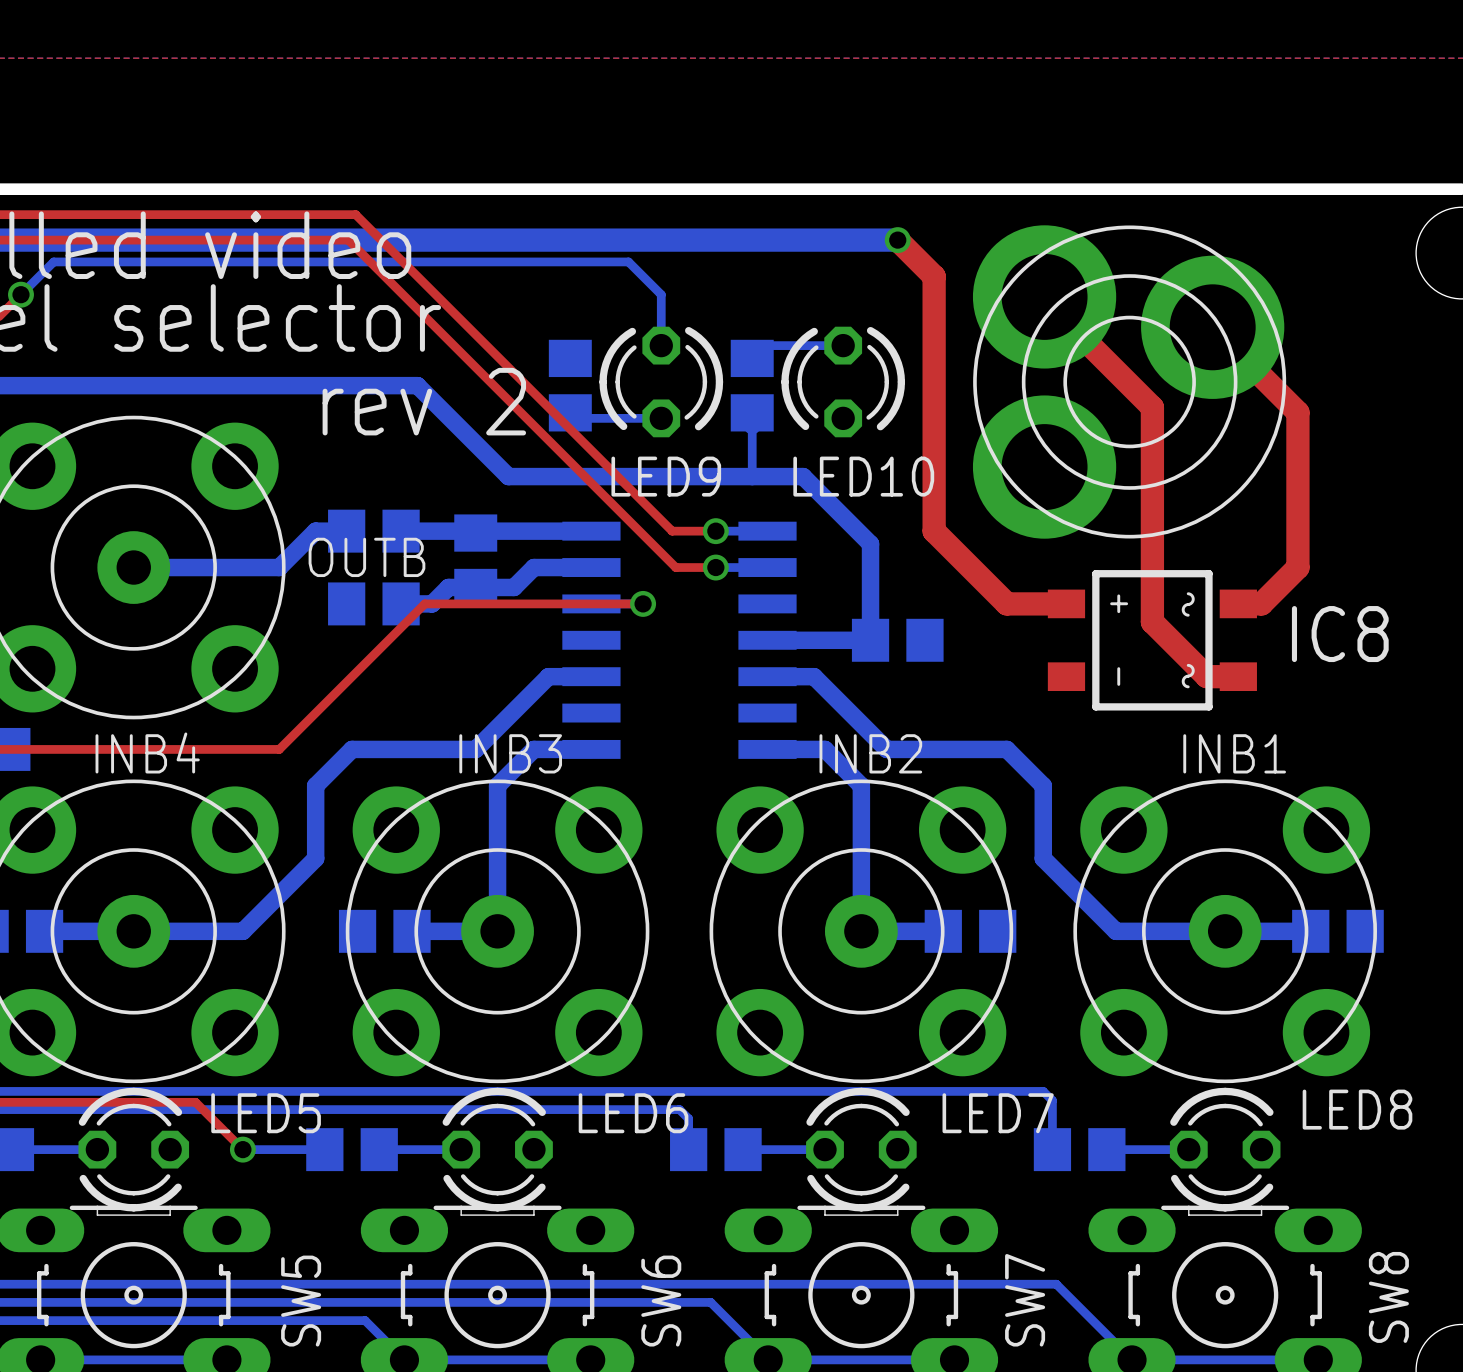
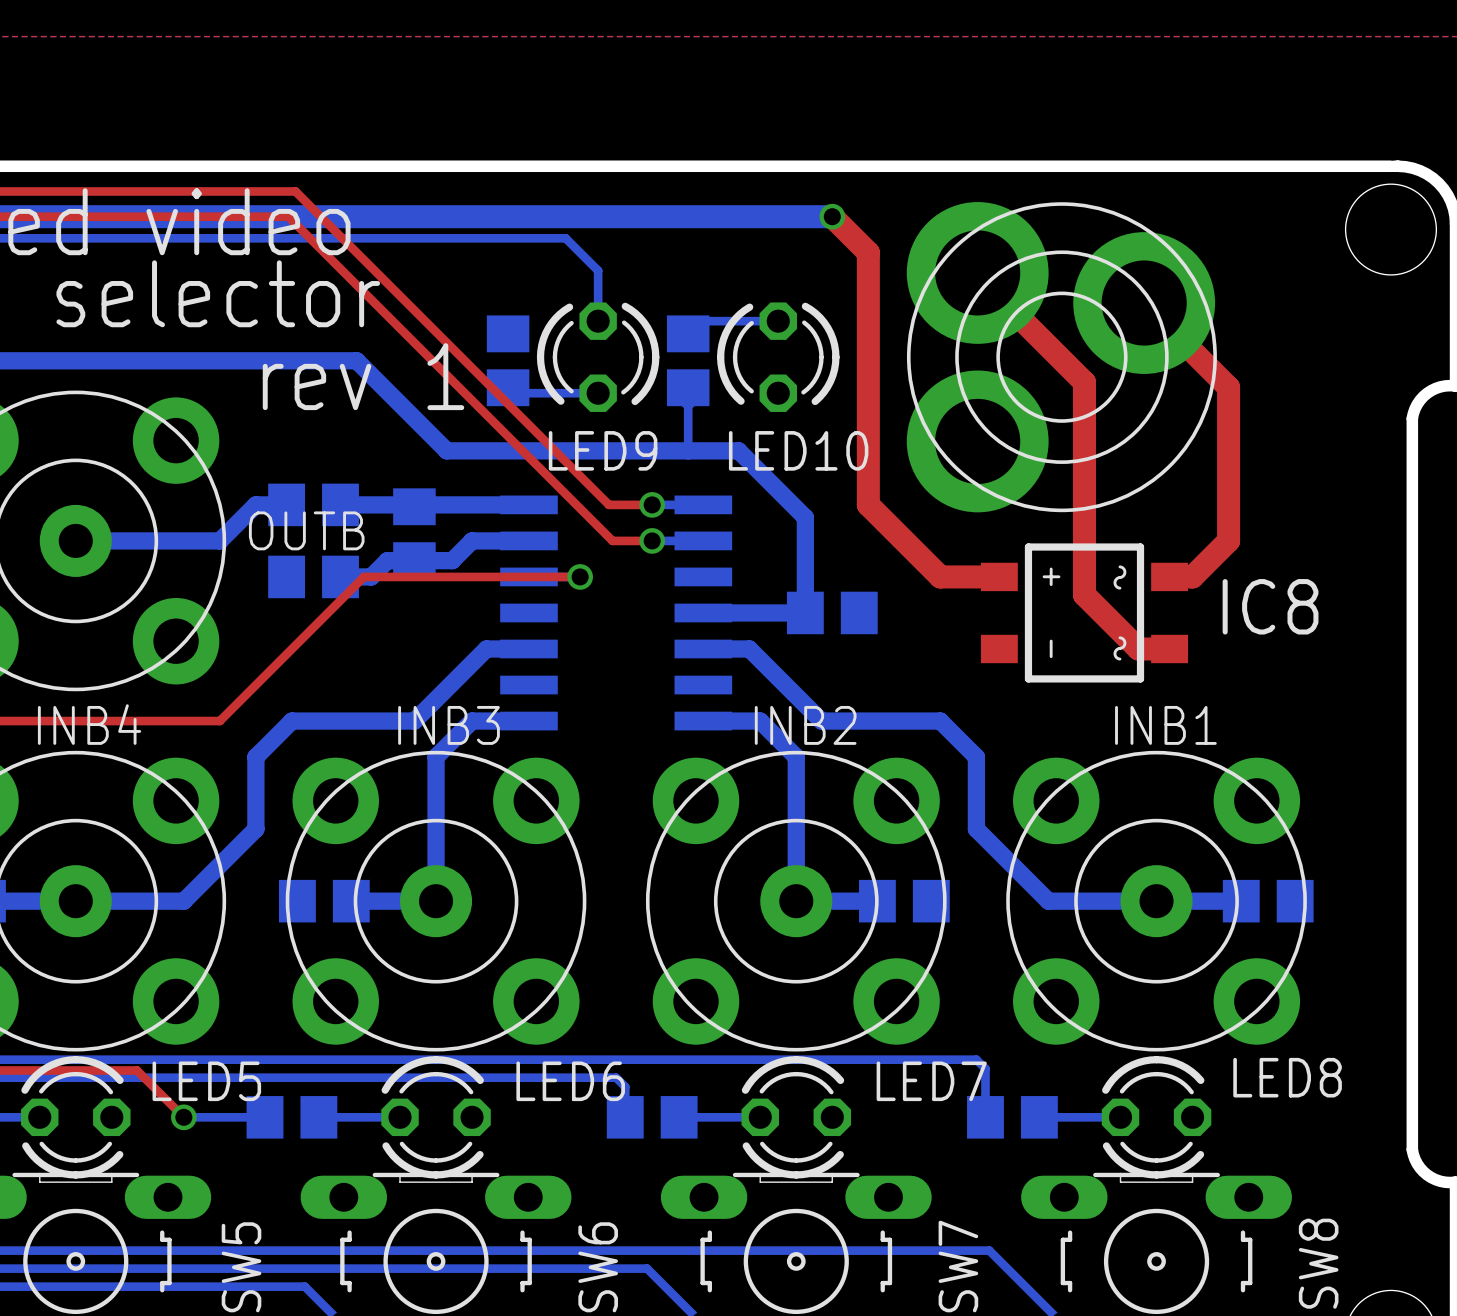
text: rev 2 (424, 401) -> rev 1 (363, 376)

